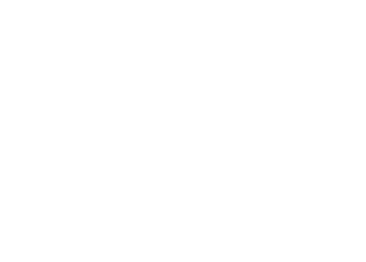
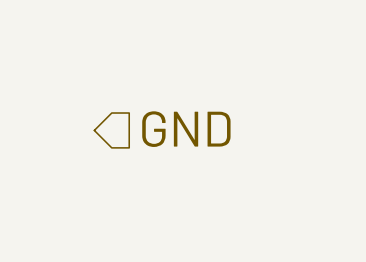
hierarchical label: none -> GND (186, 129)

